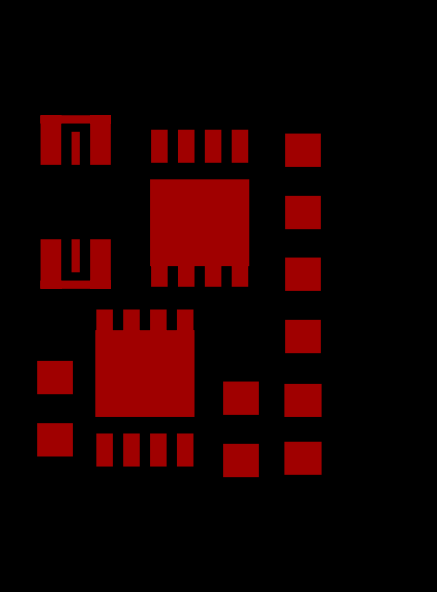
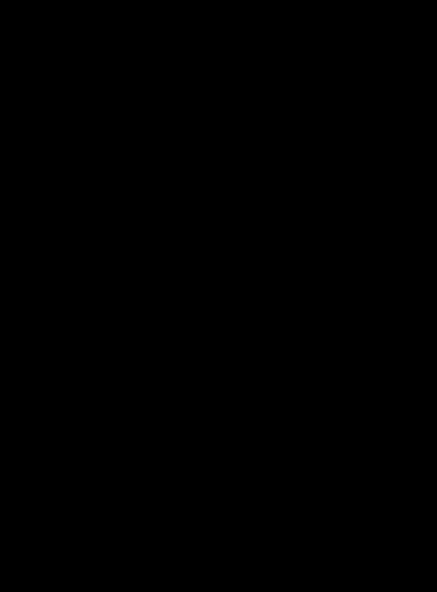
part: (302, 181) -> none
part: (75, 202) -> none
part: (199, 208) -> none
part: (302, 305) -> none
part: (144, 388) -> none
part: (55, 408) -> none
part: (240, 429) -> none
part: (302, 429) -> none

